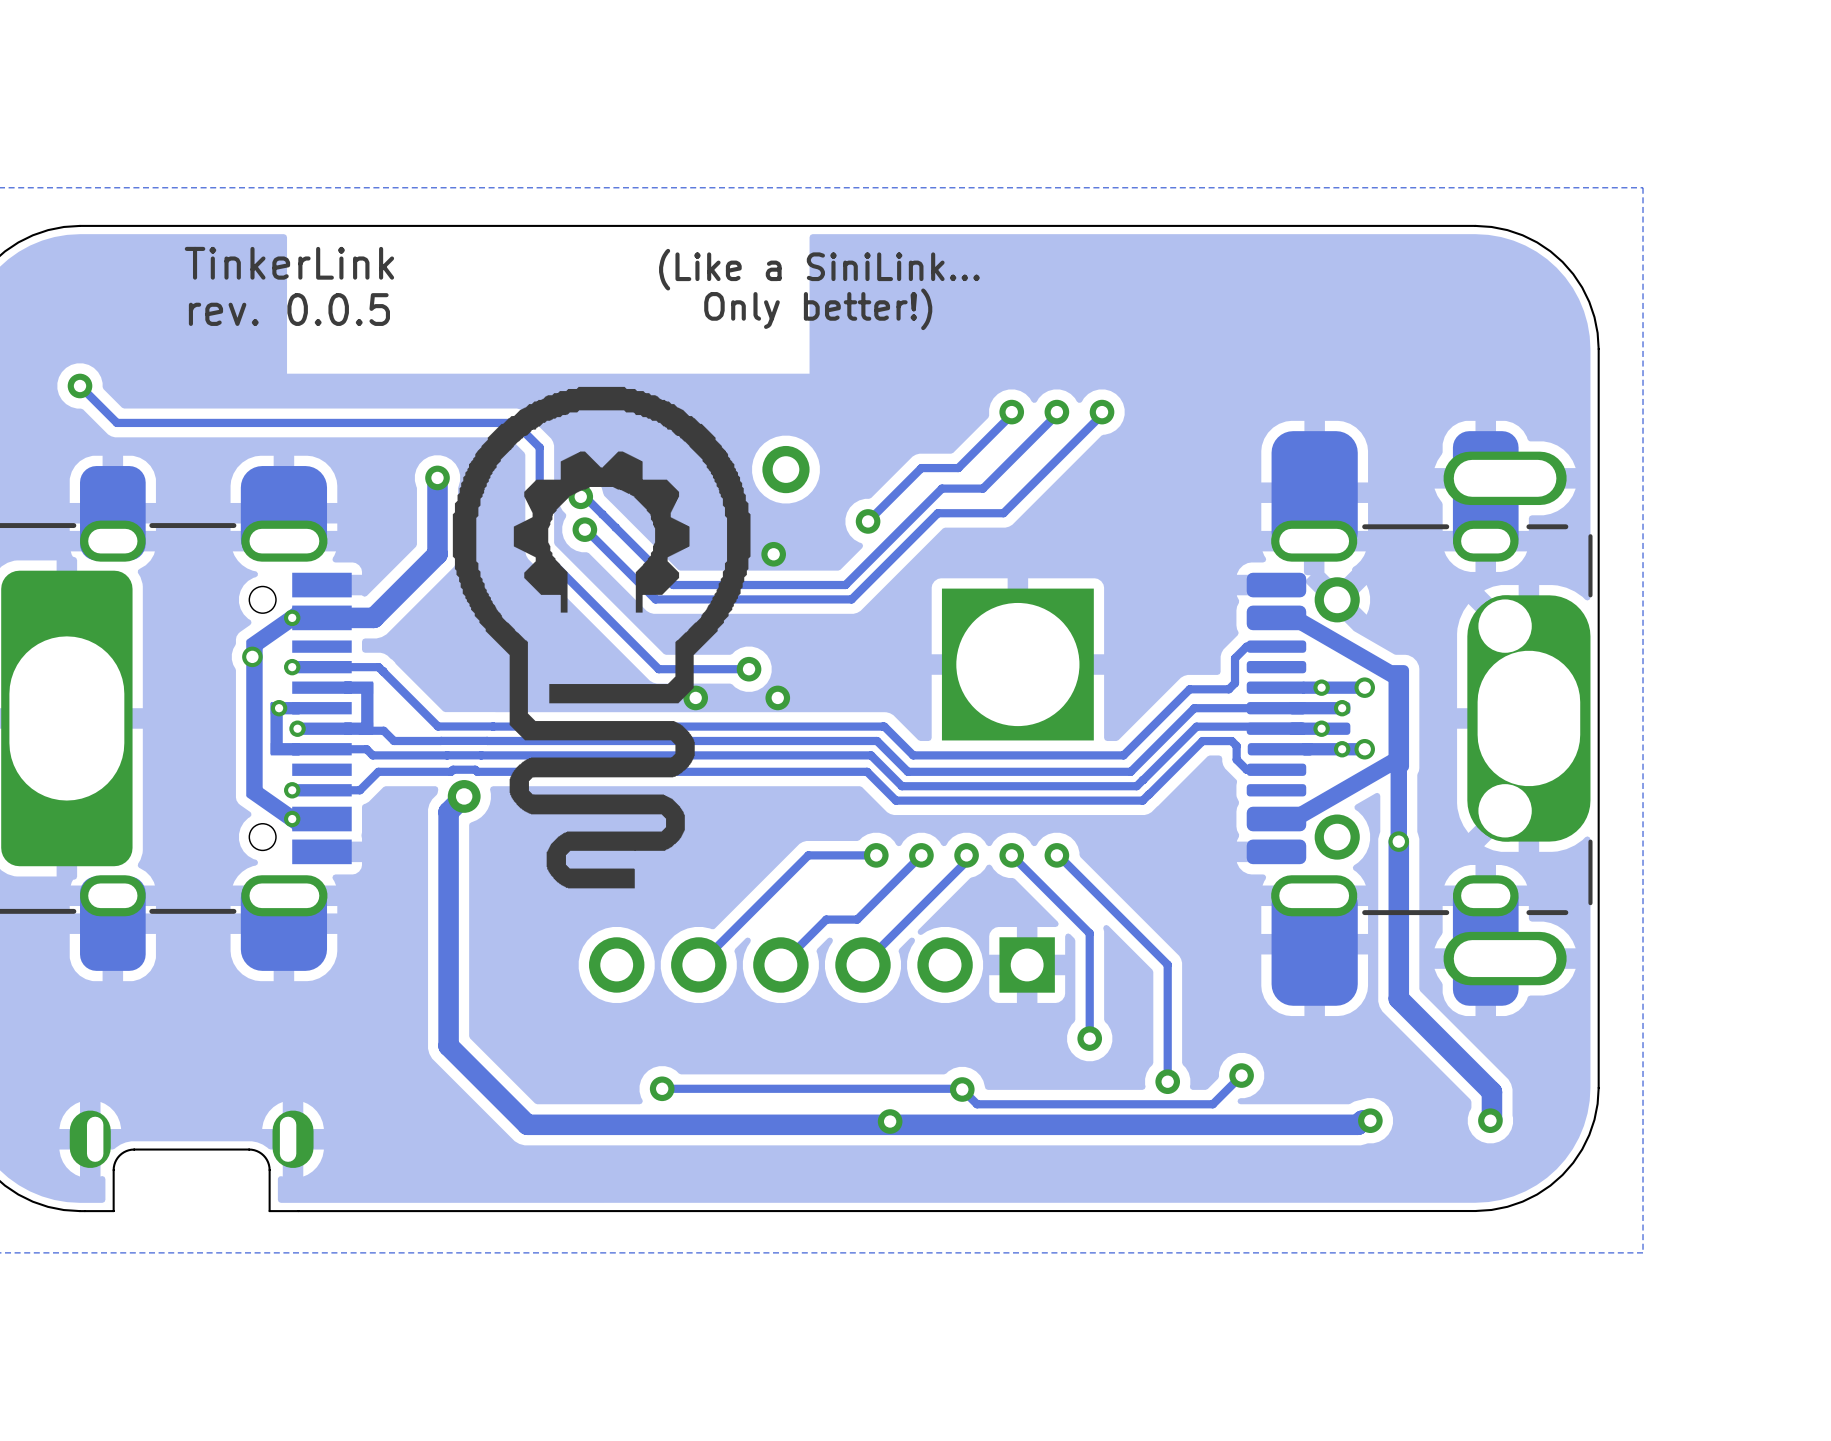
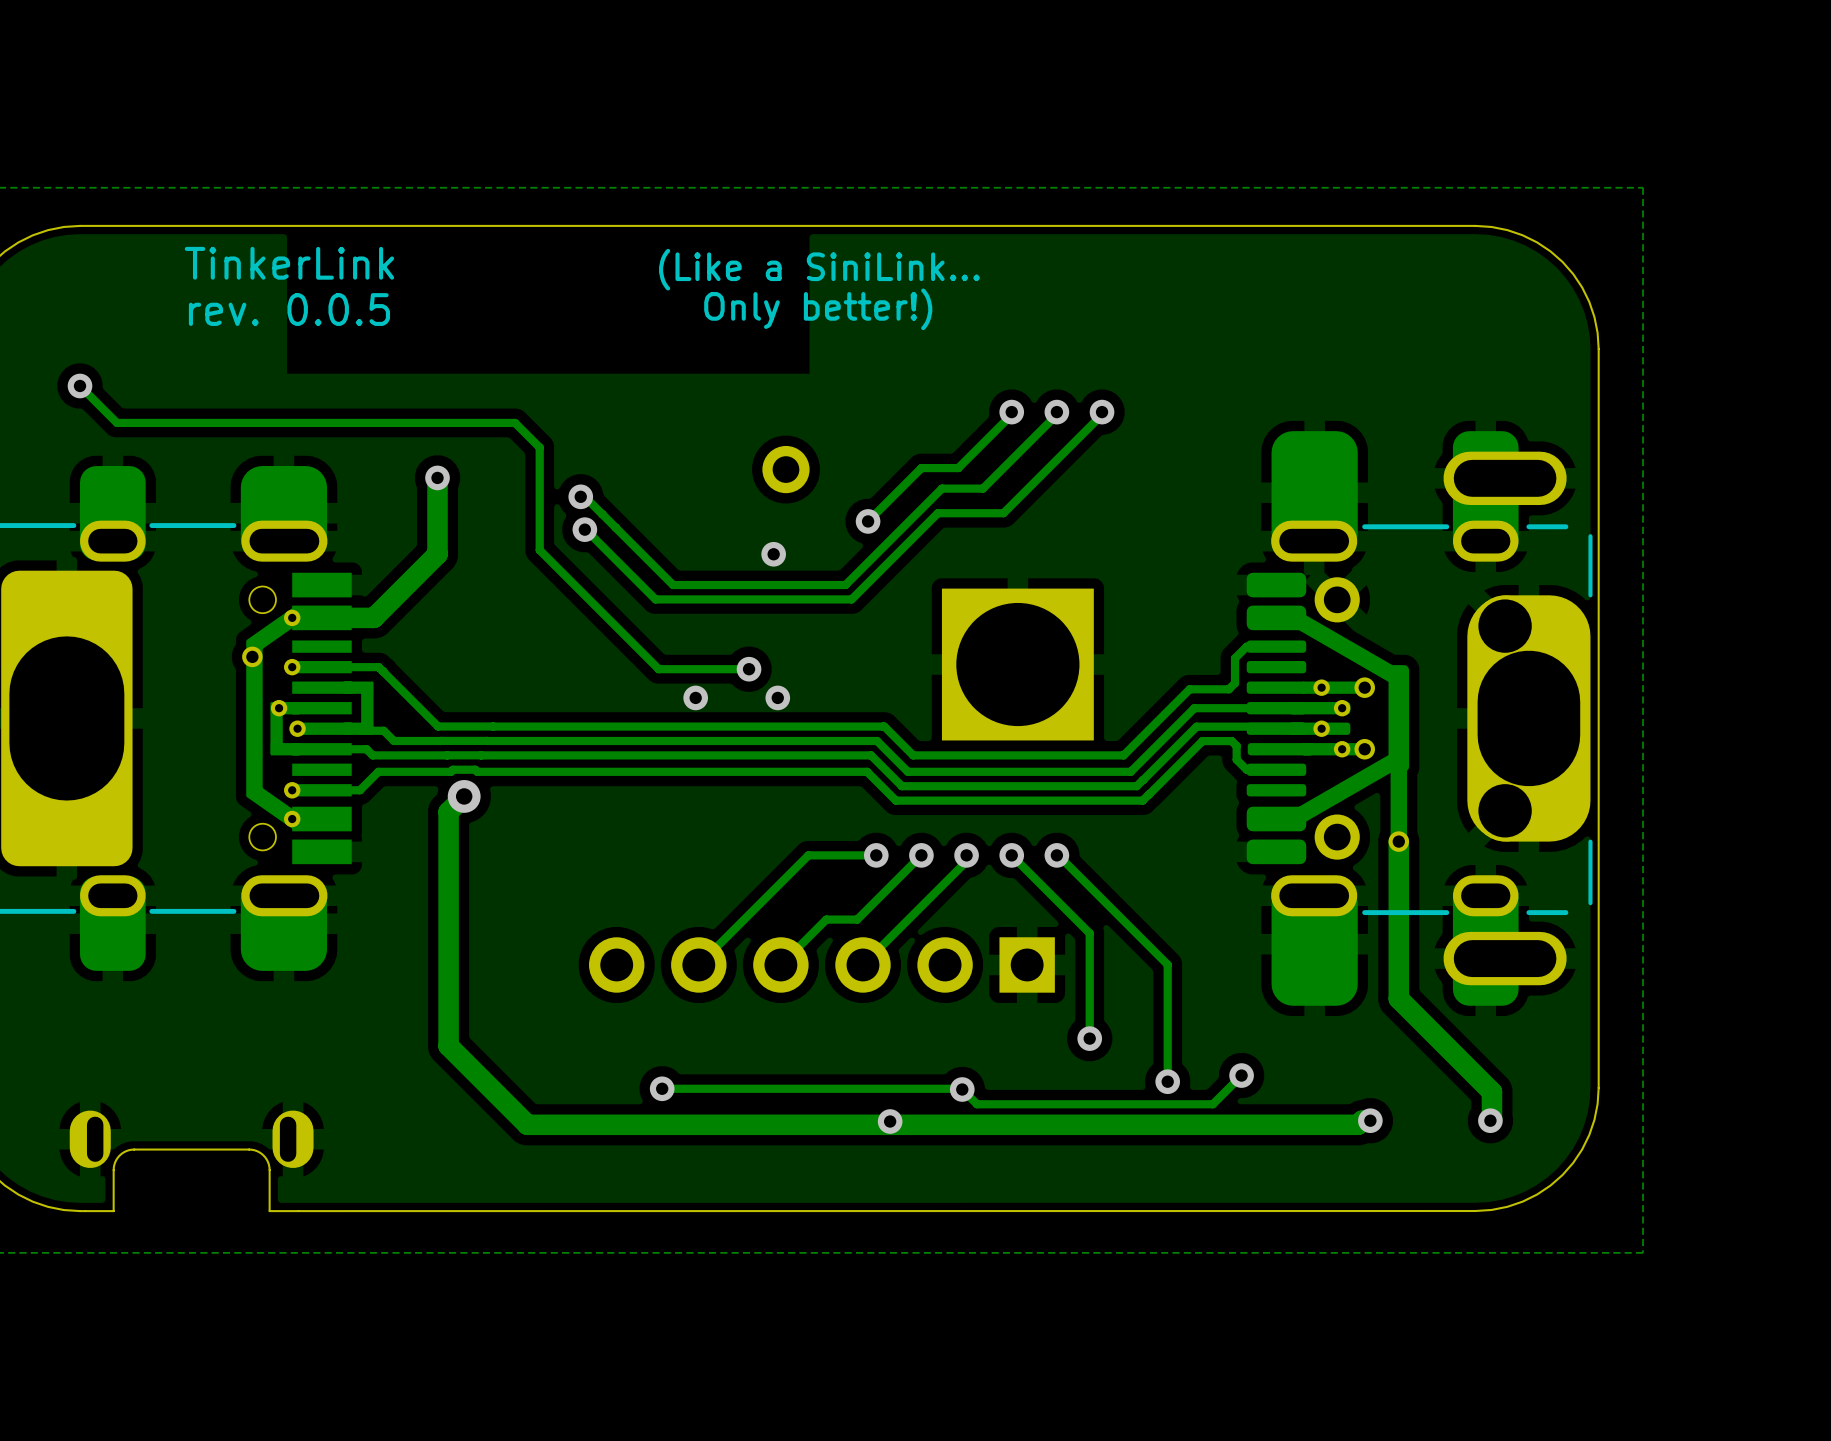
drawing: [452, 386, 751, 889] -> none

